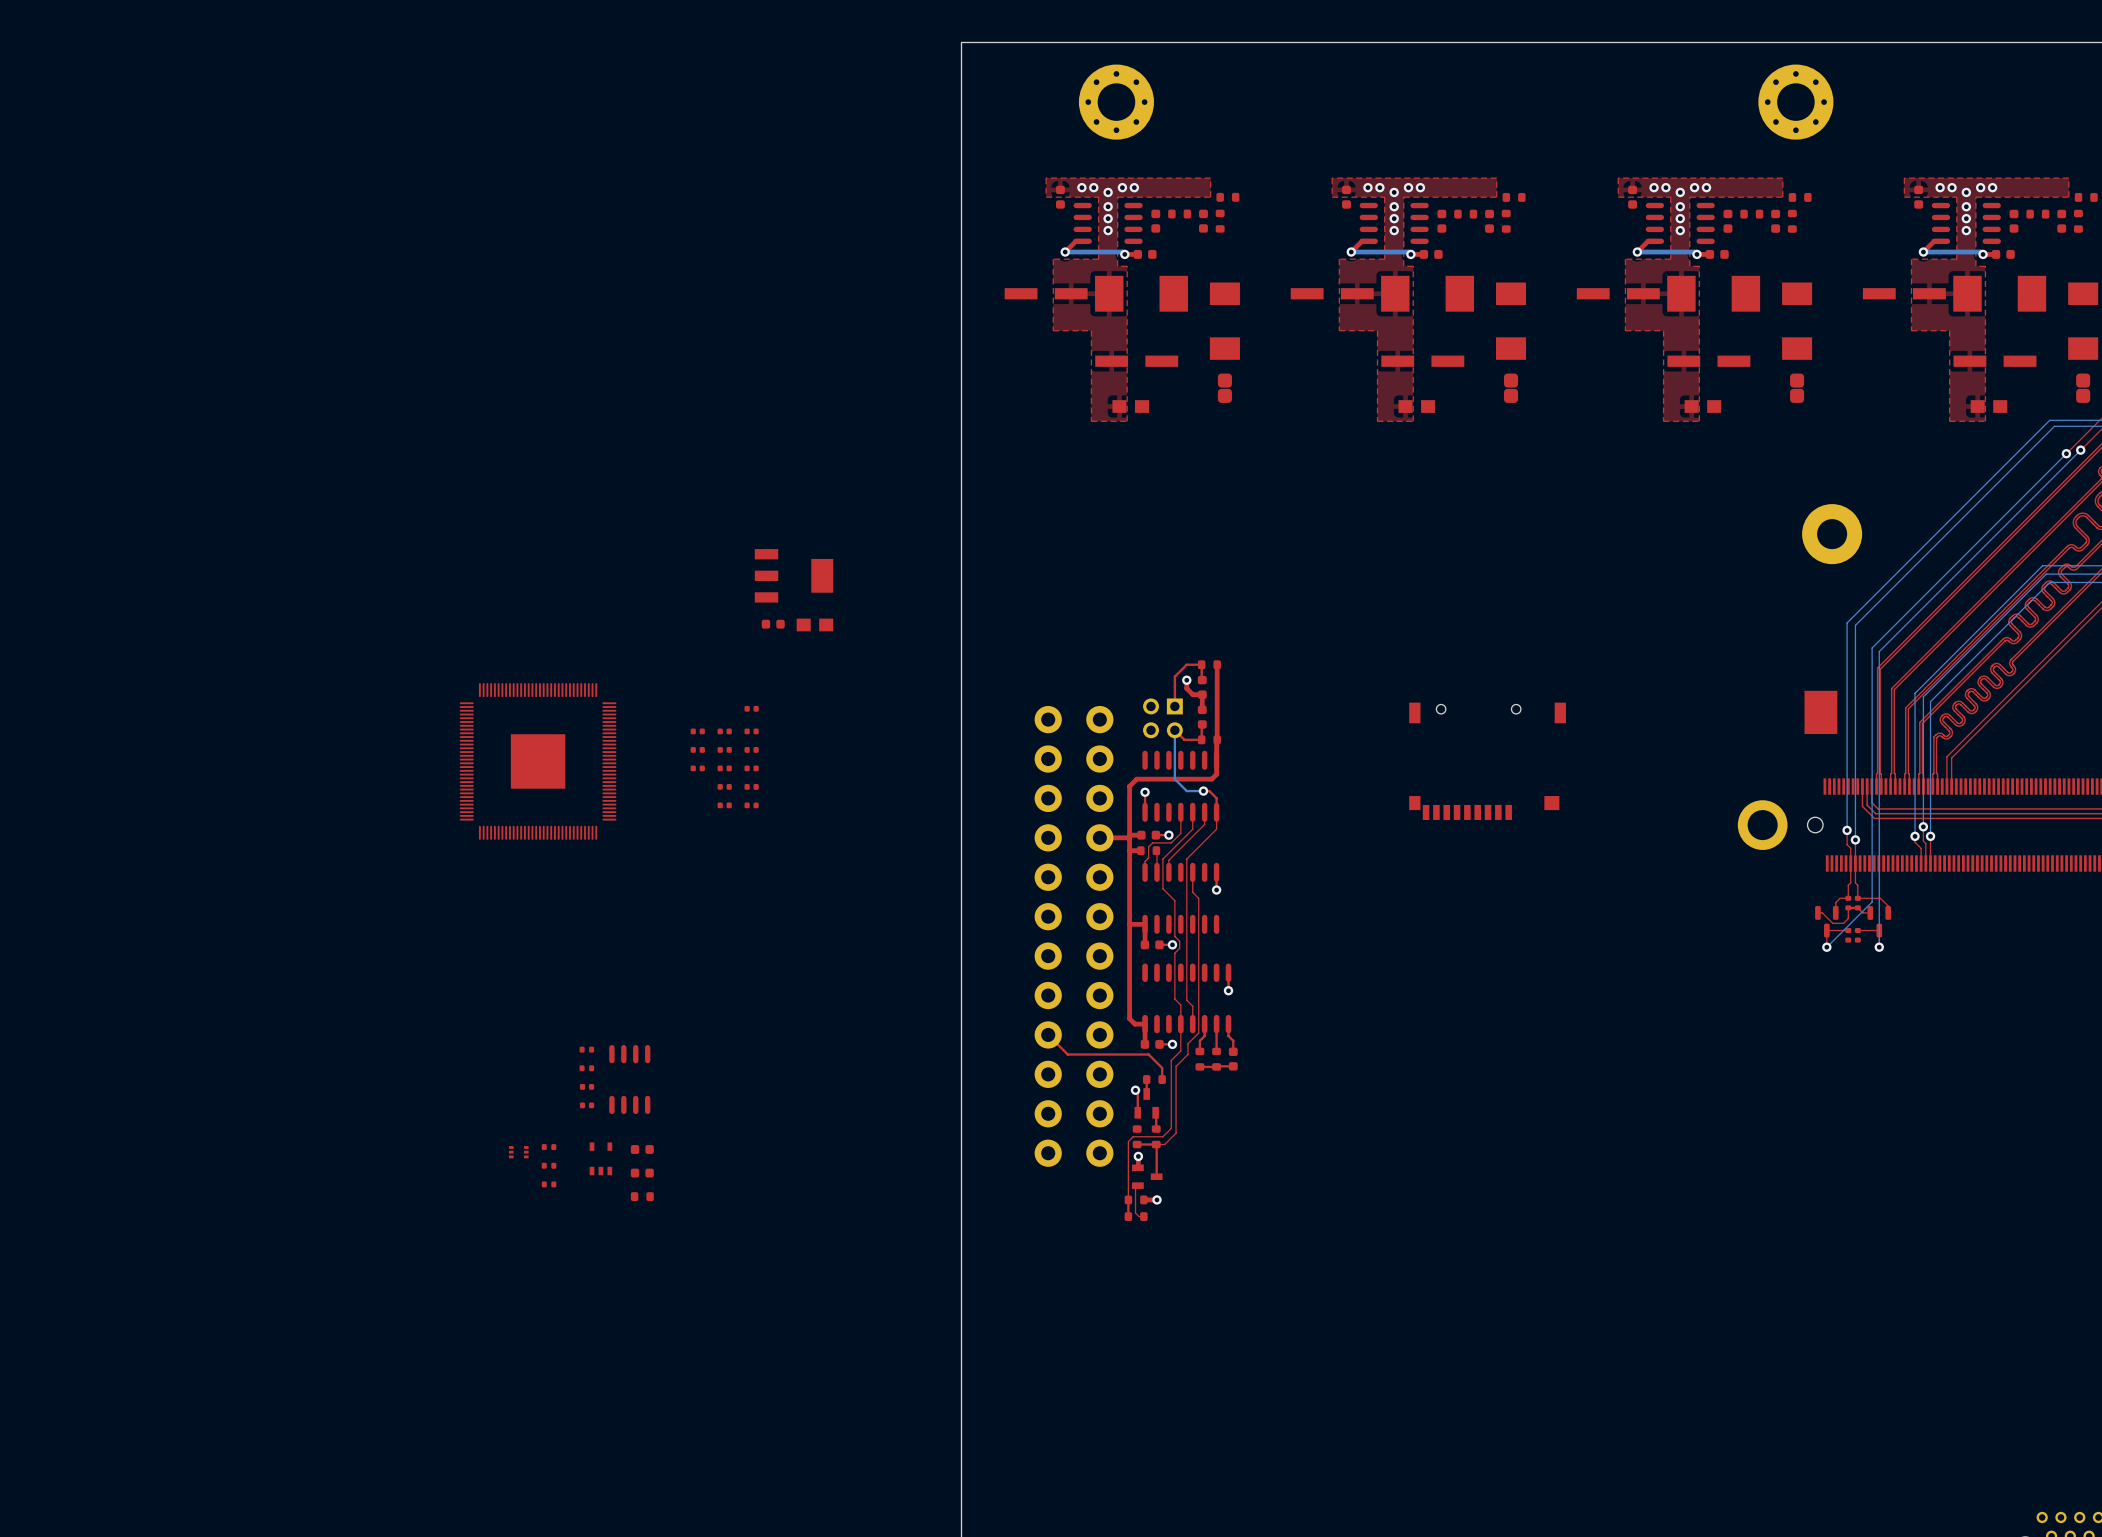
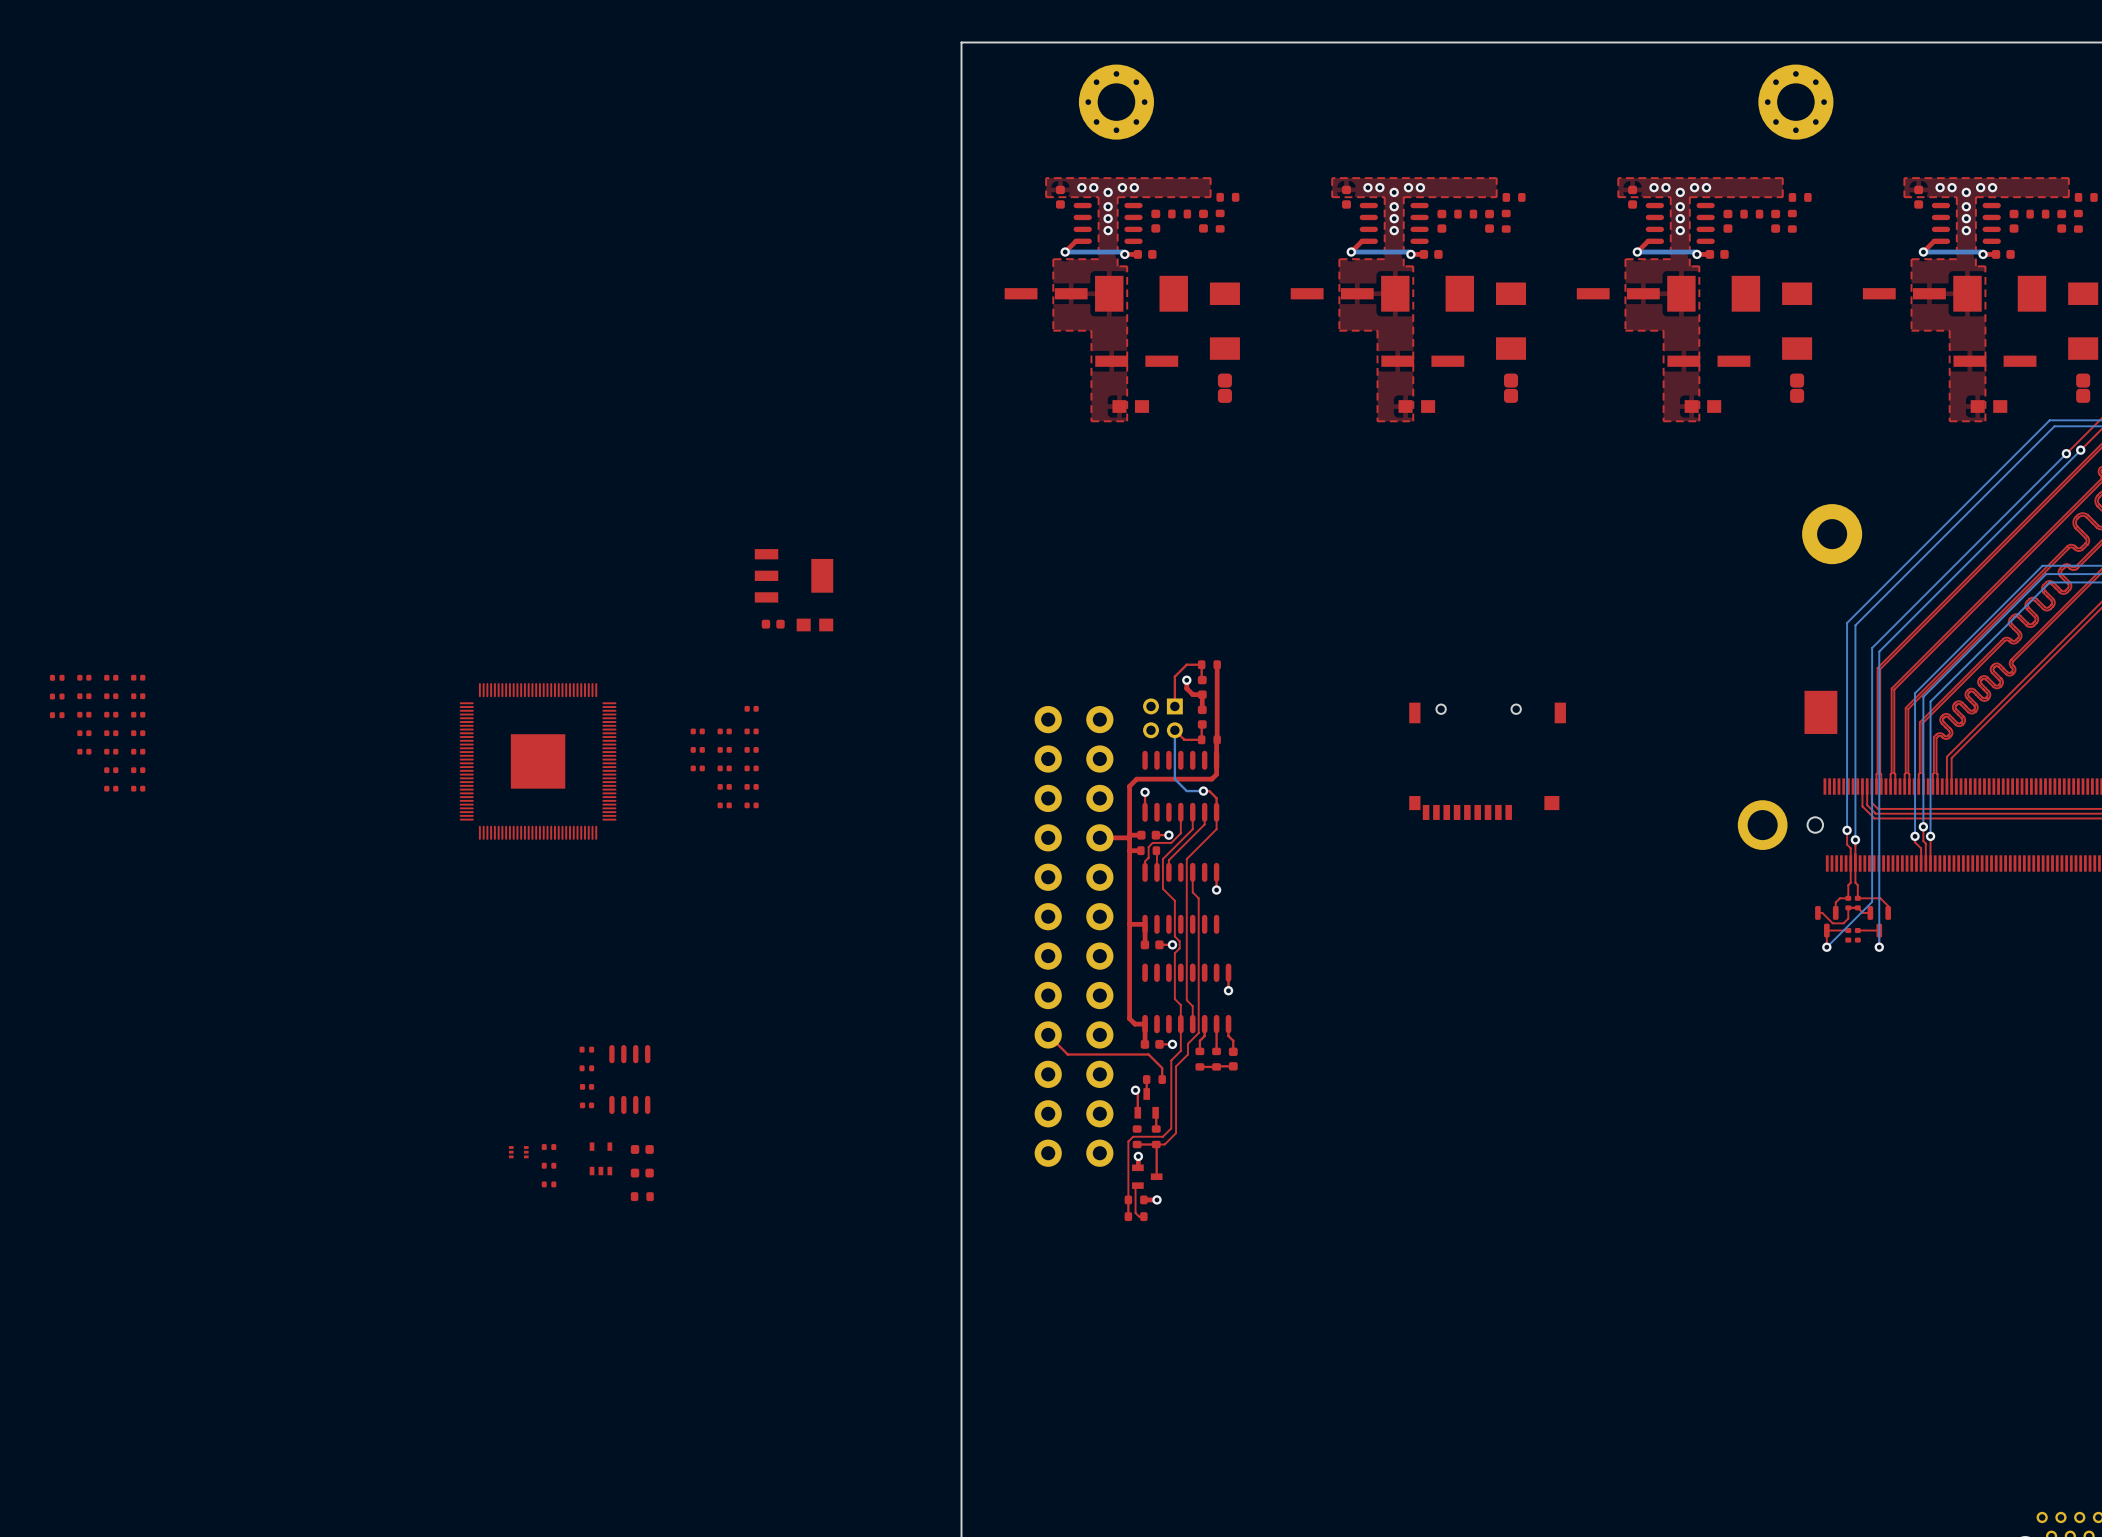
part: none -> (57, 677)
part: none -> (84, 677)
part: none -> (111, 677)
part: none -> (138, 677)
part: none -> (57, 696)
part: none -> (84, 696)
part: none -> (111, 696)
part: none -> (138, 696)
part: none -> (84, 714)
part: none -> (111, 714)
part: none -> (138, 714)
part: none -> (57, 715)
part: none -> (84, 733)
part: none -> (111, 733)
part: none -> (138, 733)
part: none -> (84, 751)
part: none -> (111, 751)
part: none -> (138, 751)
part: none -> (111, 770)
part: none -> (138, 770)
part: none -> (111, 788)
part: none -> (138, 788)

